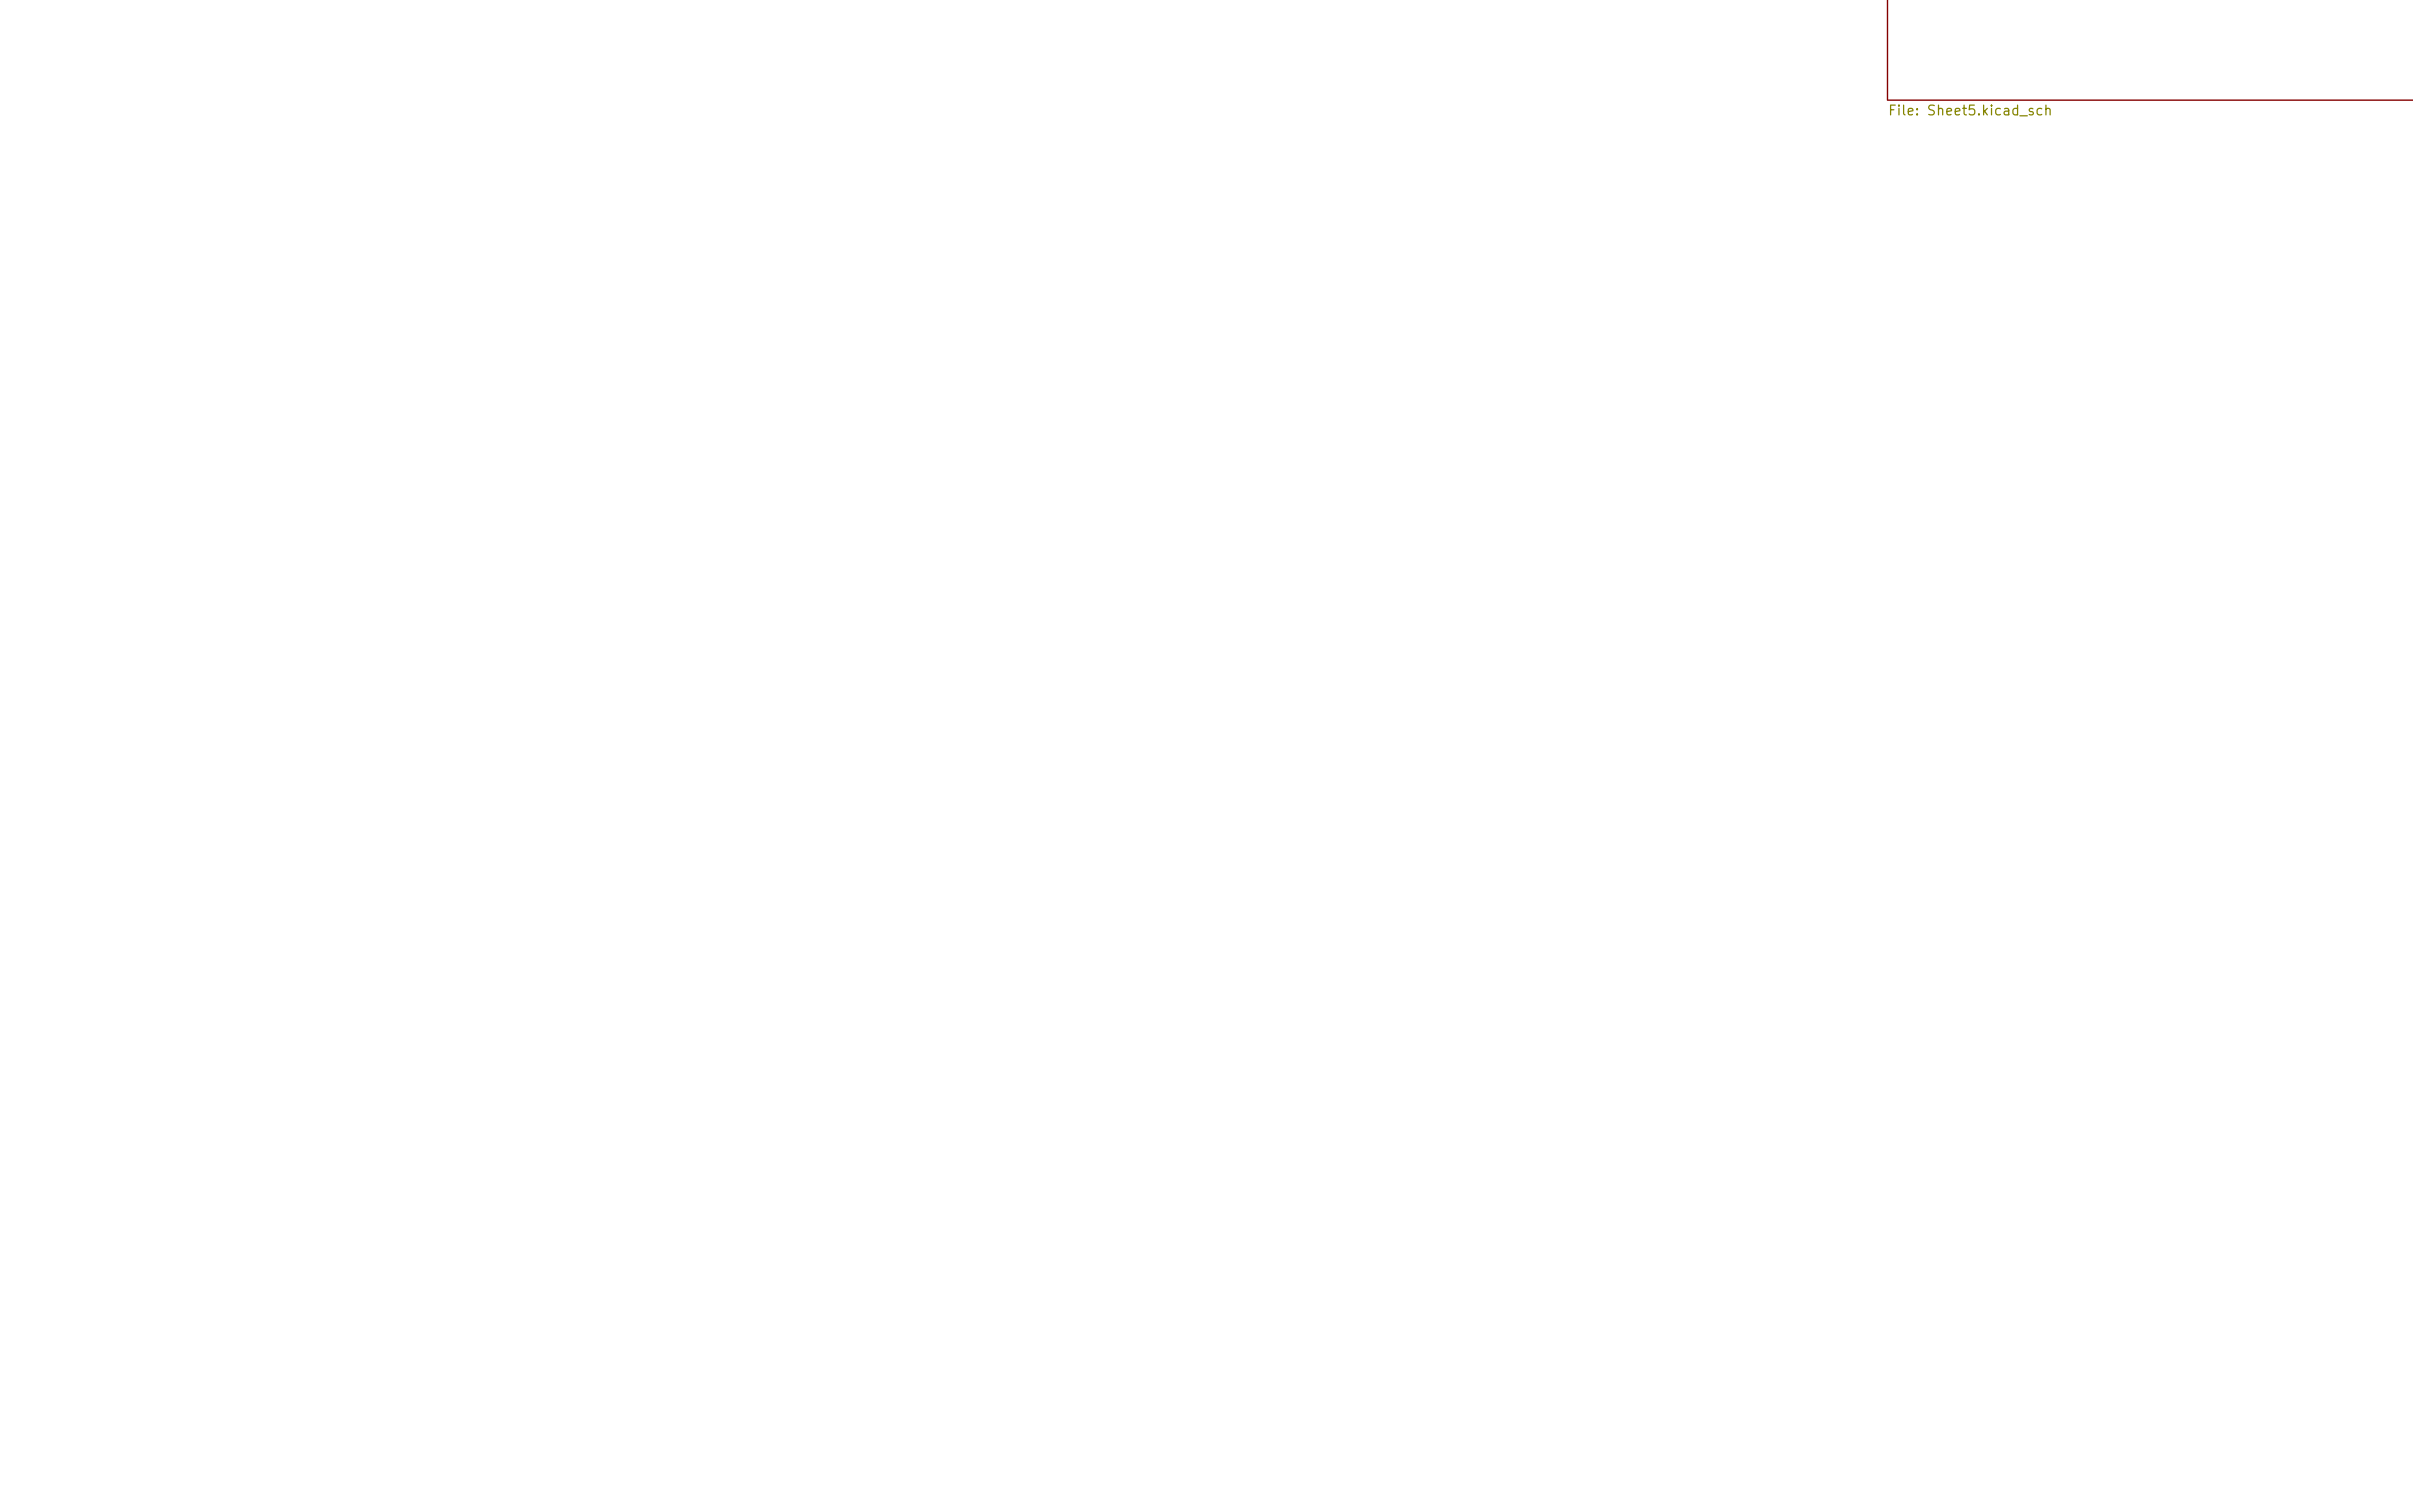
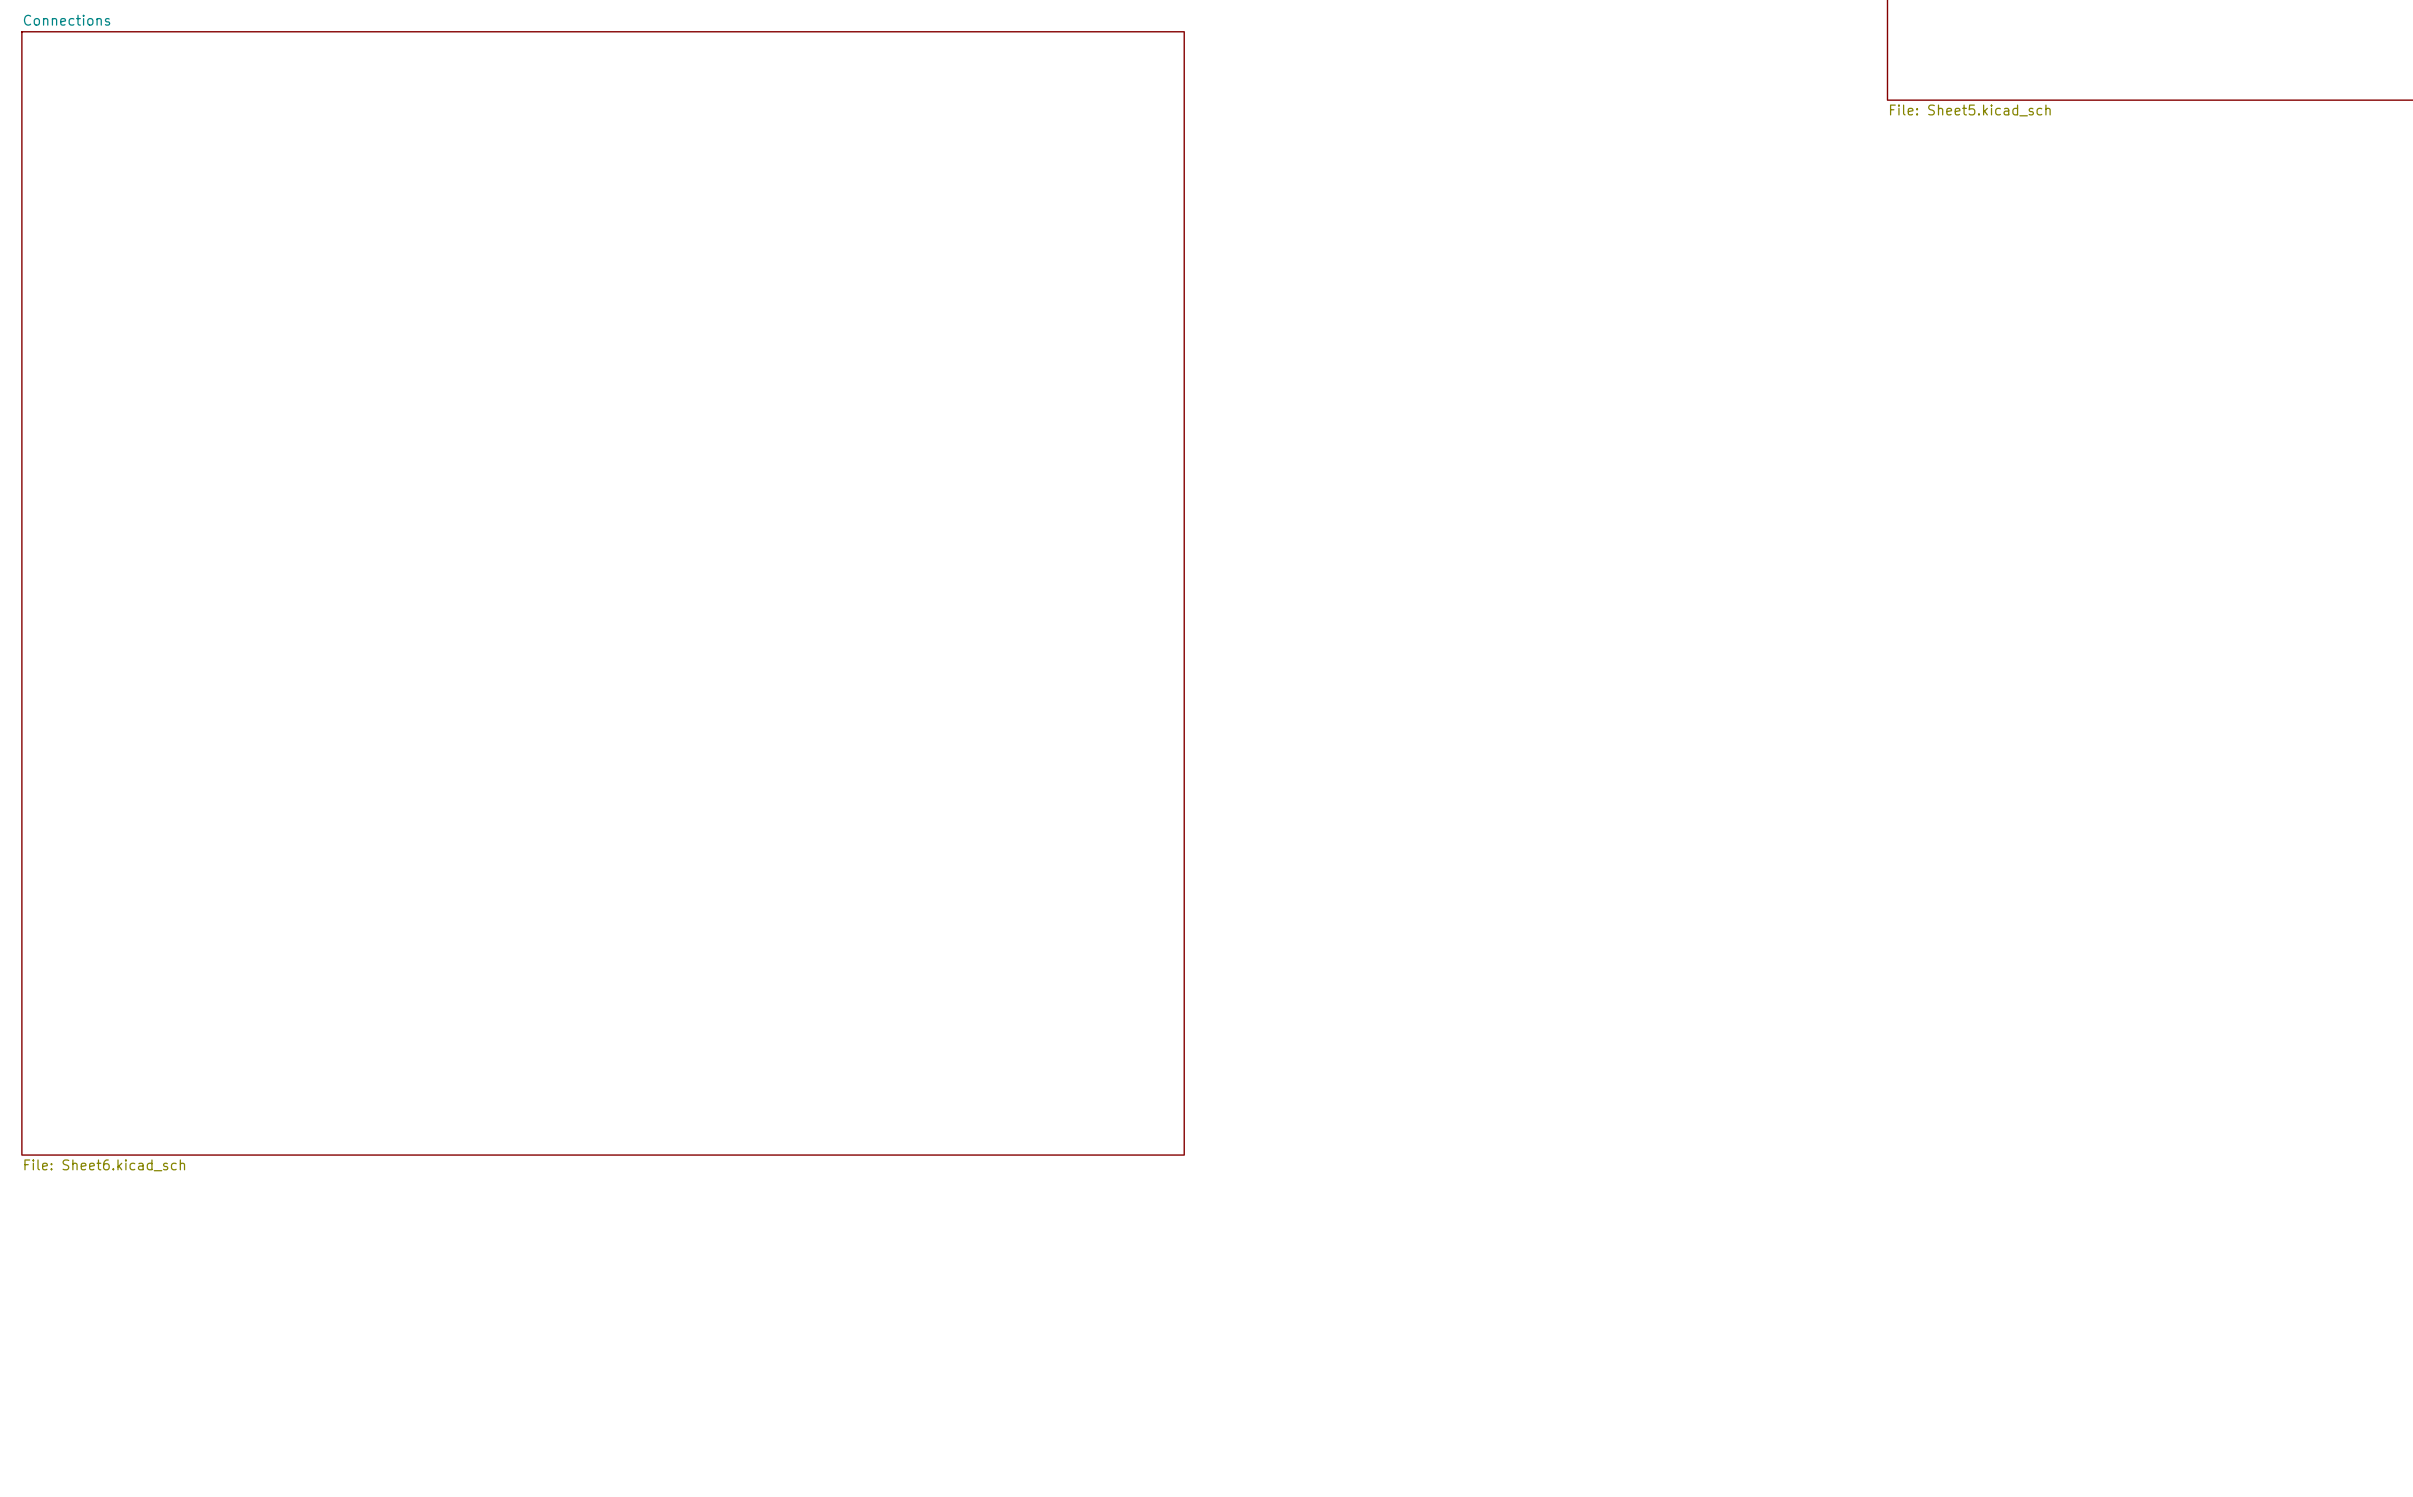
sheet Connections: none -> File: Sheet6.kicad_sch (603, 593)

